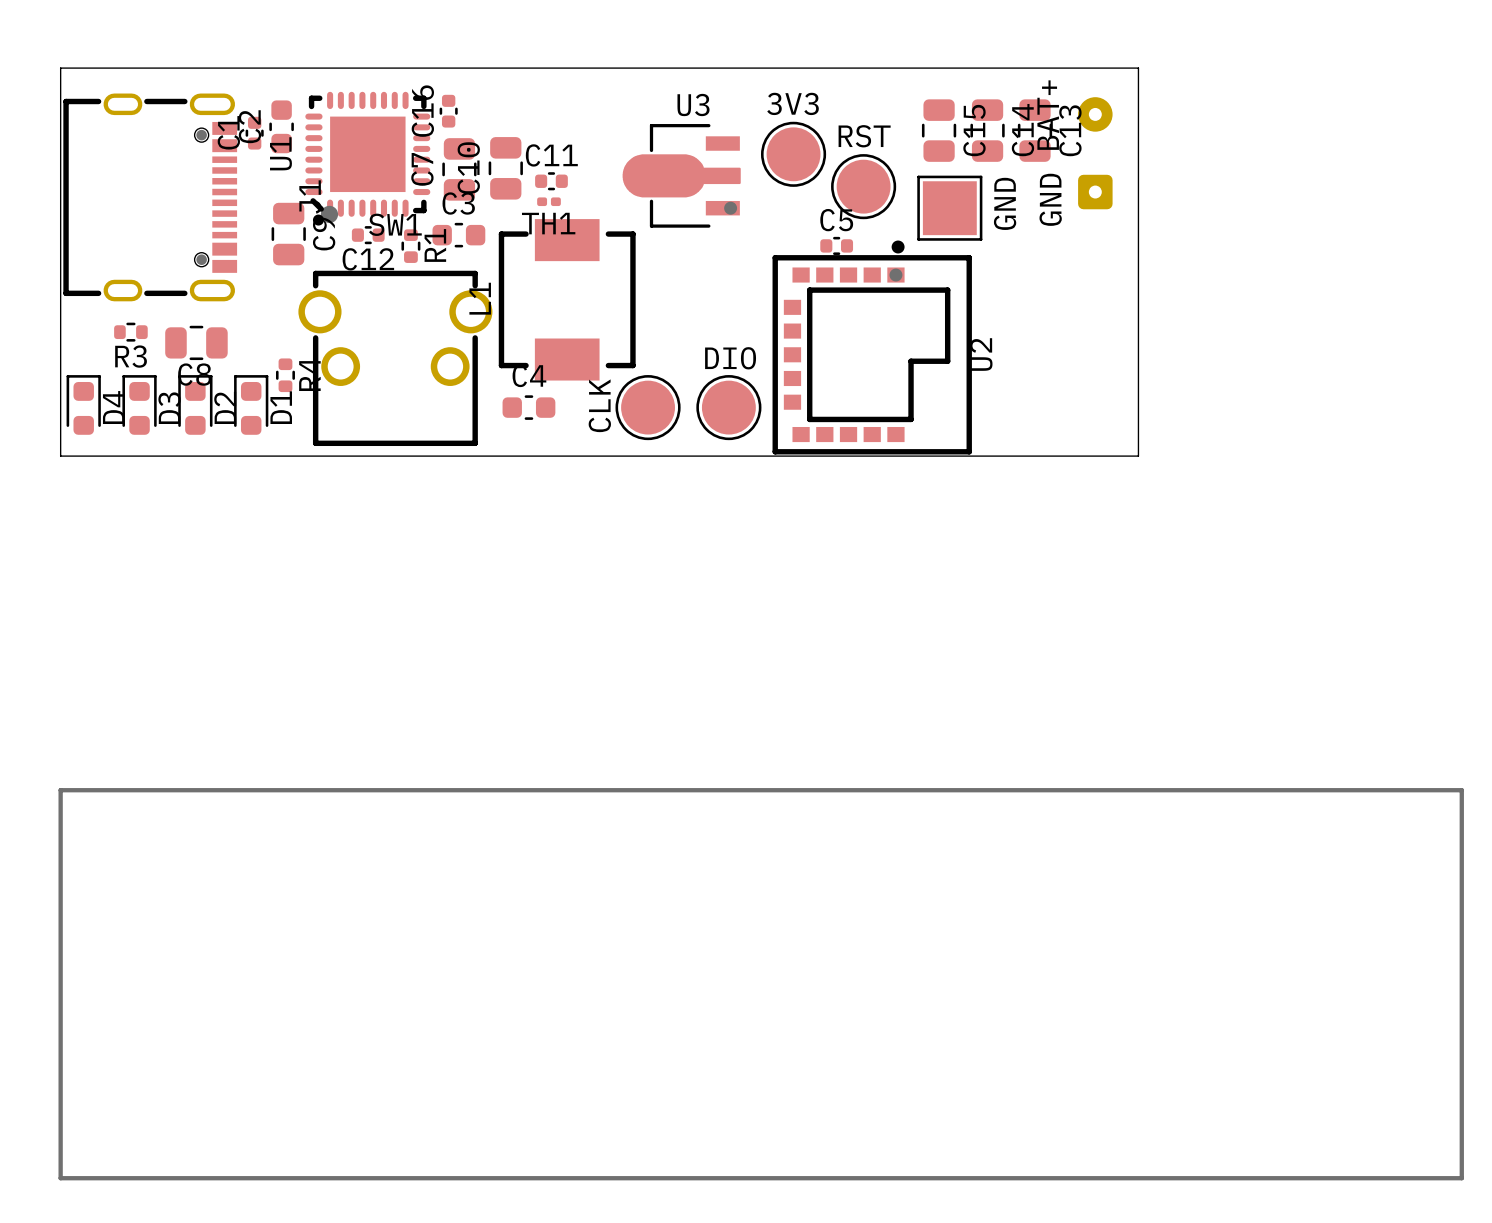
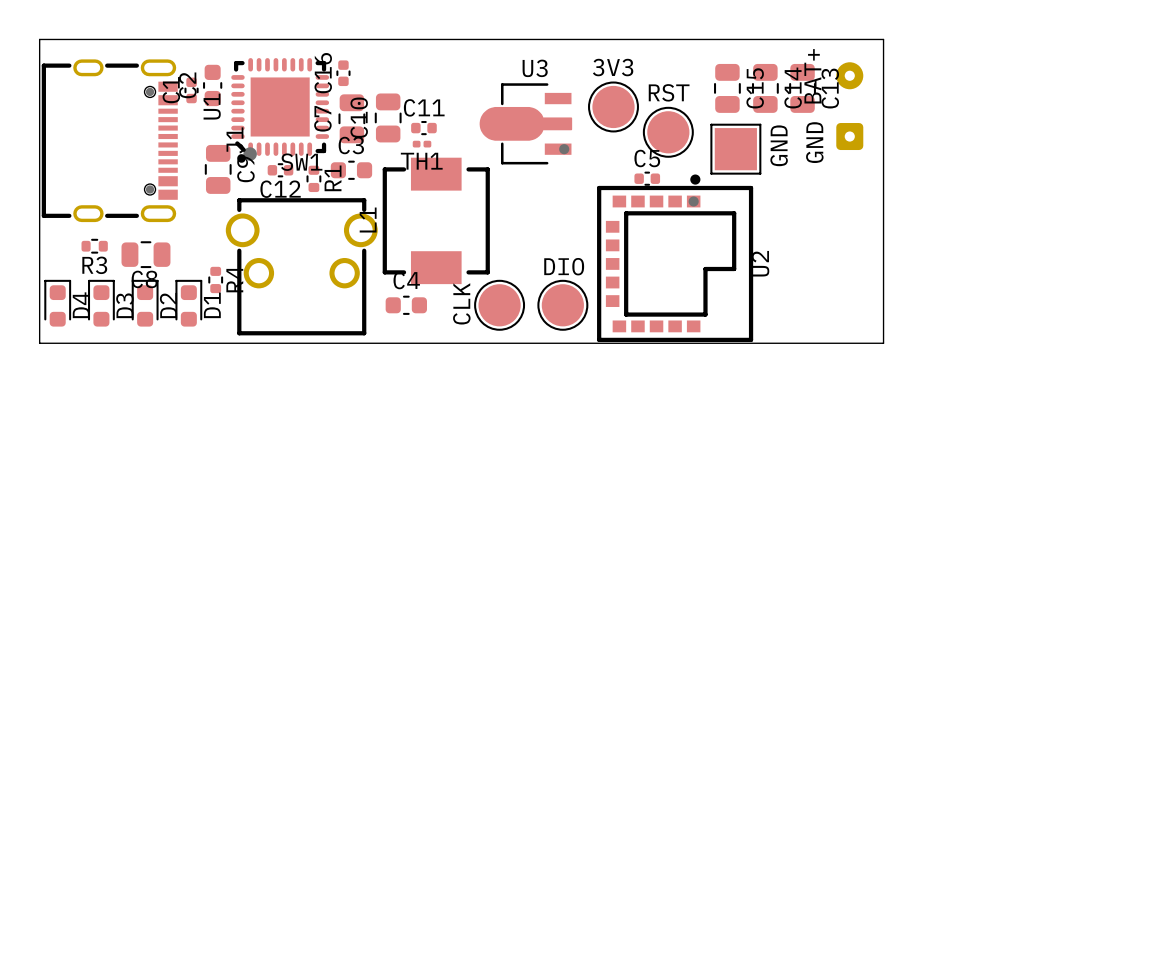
line: (60, 790) (1461, 790) (1461, 1178) (60, 1178) (60, 790) -> none

